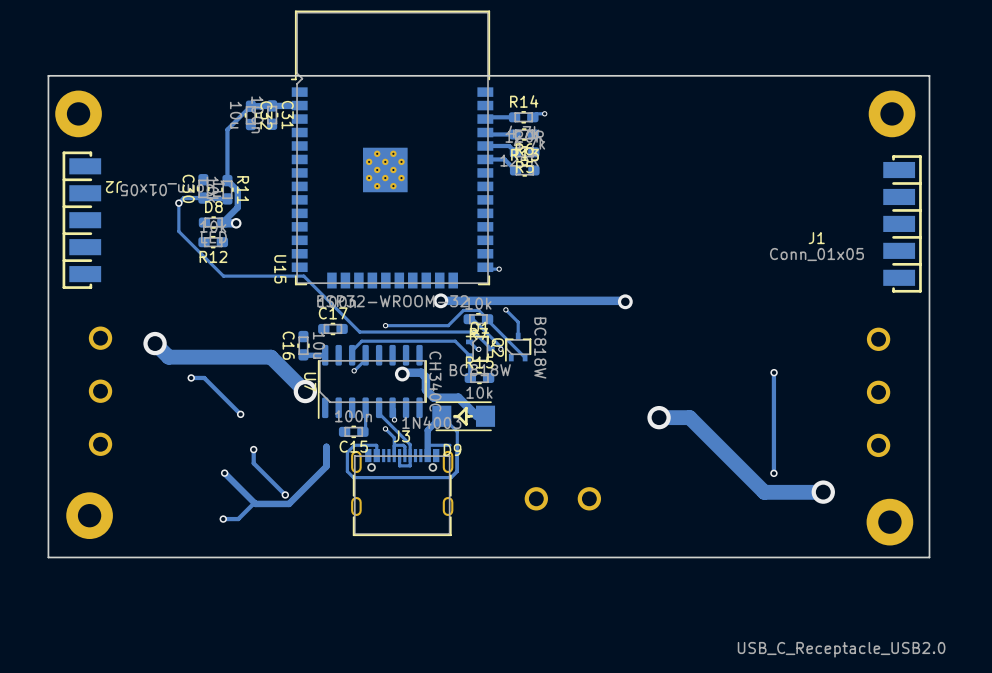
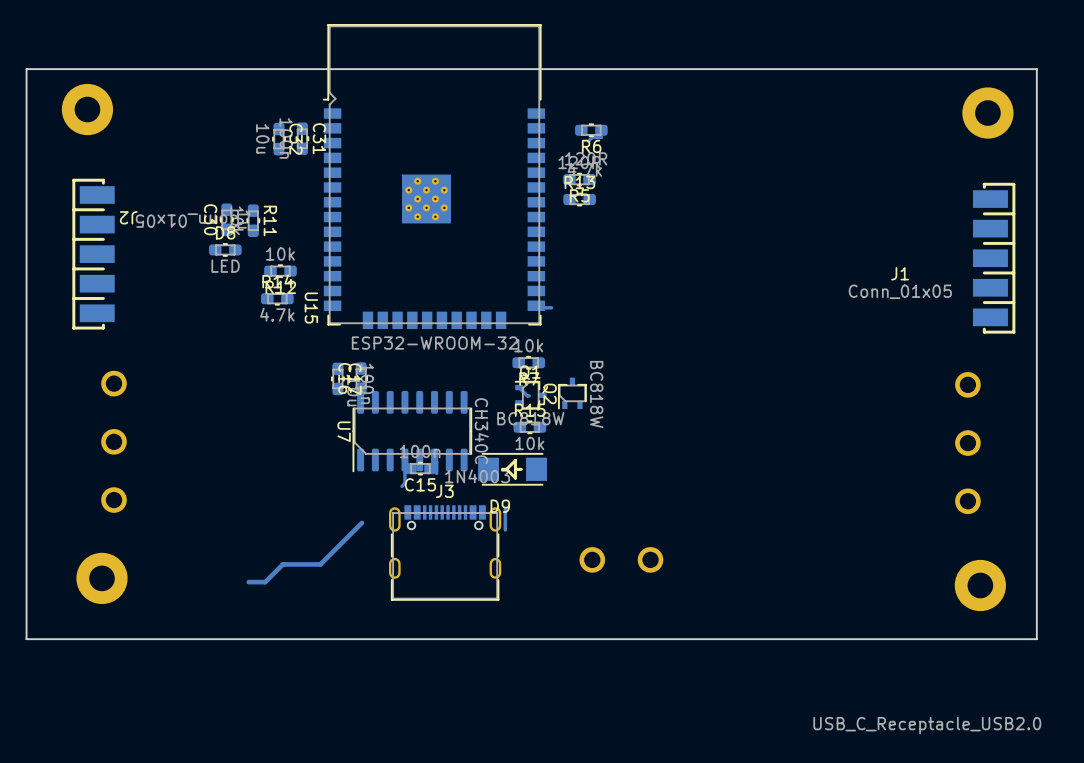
board edge: (929, 75) (48, 75) (48, 557) (929, 557) (929, 75) -> (1036, 69) (1036, 639) (26, 639) (26, 69) (1036, 69)
track: (251, 105) (227, 129) (227, 180) (237, 190) (237, 207) (222, 222) (236, 223) -> none
track: (299, 105) (250, 106) -> none
part position: (78, 113) -> (87, 109)
via: (544, 113) -> none
part position: (892, 113) -> (987, 113)
track: (514, 117) (487, 117) (485, 119) -> none
R14 position: (523, 117) -> (277, 298)
track: (485, 132) (487, 134) (515, 134) -> none
R6 position: (524, 134) -> (591, 130)
track: (485, 146) (509, 146) (515, 152) -> none
track: (485, 159) (504, 159) (515, 170) -> none
track: (227, 198) (183, 198) (178, 203) (178, 231) (223, 276) (303, 276) (359, 332) (474, 332) (490, 348) -> none
via: (178, 203) -> none
D8 position: (213, 222) -> (225, 249)
via: (236, 223) -> none
R12 position: (213, 242) -> (280, 271)
via: (499, 269) -> none
track: (440, 300) (625, 301) -> none
via: (440, 300) -> none
via: (625, 301) -> none
track: (505, 309) (518, 322) (518, 336) -> none
via: (505, 309) -> none
track: (469, 319) (472, 319) (500, 347) (500, 349) -> none
track: (385, 325) (448, 325) (463, 310) (478, 310) (525, 357) -> none
via: (385, 325) -> none
C17 rotation: 0° (332, 328) -> 90° clockwise (337, 378)
C17 position: (332, 328) -> (337, 378)
track: (155, 343) (168, 357) (271, 357) (305, 391) -> none
via: (155, 343) -> none
C16 position: (303, 345) -> (361, 378)
via: (478, 349) -> none
via: (500, 349) -> none
track: (303, 354) (325, 355) -> none
track: (352, 355) (352, 350) (361, 341) (455, 341) (469, 355) (470, 377) -> none
track: (365, 355) (365, 359) (354, 370) -> none
via: (354, 370) -> none
track: (773, 372) (773, 473) -> none
via: (774, 372) -> none
track: (402, 374) (421, 372) (425, 377) (425, 389) (433, 397) (458, 397) (477, 416) -> none
via: (402, 374) -> none
track: (191, 377) (204, 377) (240, 414) -> none
via: (191, 377) -> none
via: (305, 391) -> none
track: (379, 407) (379, 413) (410, 444) (410, 465) (399, 465) (399, 455) -> none
via: (240, 414) -> none
track: (659, 417) (689, 417) (764, 492) (823, 492) -> none
via: (659, 417) -> none
via: (394, 419) -> none
track: (385, 428) (394, 437) (394, 455) -> none
via: (385, 428) -> none
C15 position: (353, 431) -> (420, 468)
track: (394, 445) (403, 445) (404, 455) -> none
track: (449, 445) (428, 445) (427, 455) (427, 430) (441, 416) (457, 431) (457, 471) (451, 477) (353, 477) (347, 471) (347, 452) (354, 445) (376, 445) (376, 455) -> none
track: (326, 446) (326, 466) (289, 503) (255, 503) (224, 473) -> none
track: (253, 449) (253, 463) (285, 494) -> none
via: (253, 449) -> none
via: (224, 473) -> none
via: (773, 473) -> none
via: (823, 492) -> none
via: (285, 494) -> none
via: (223, 519) -> none

